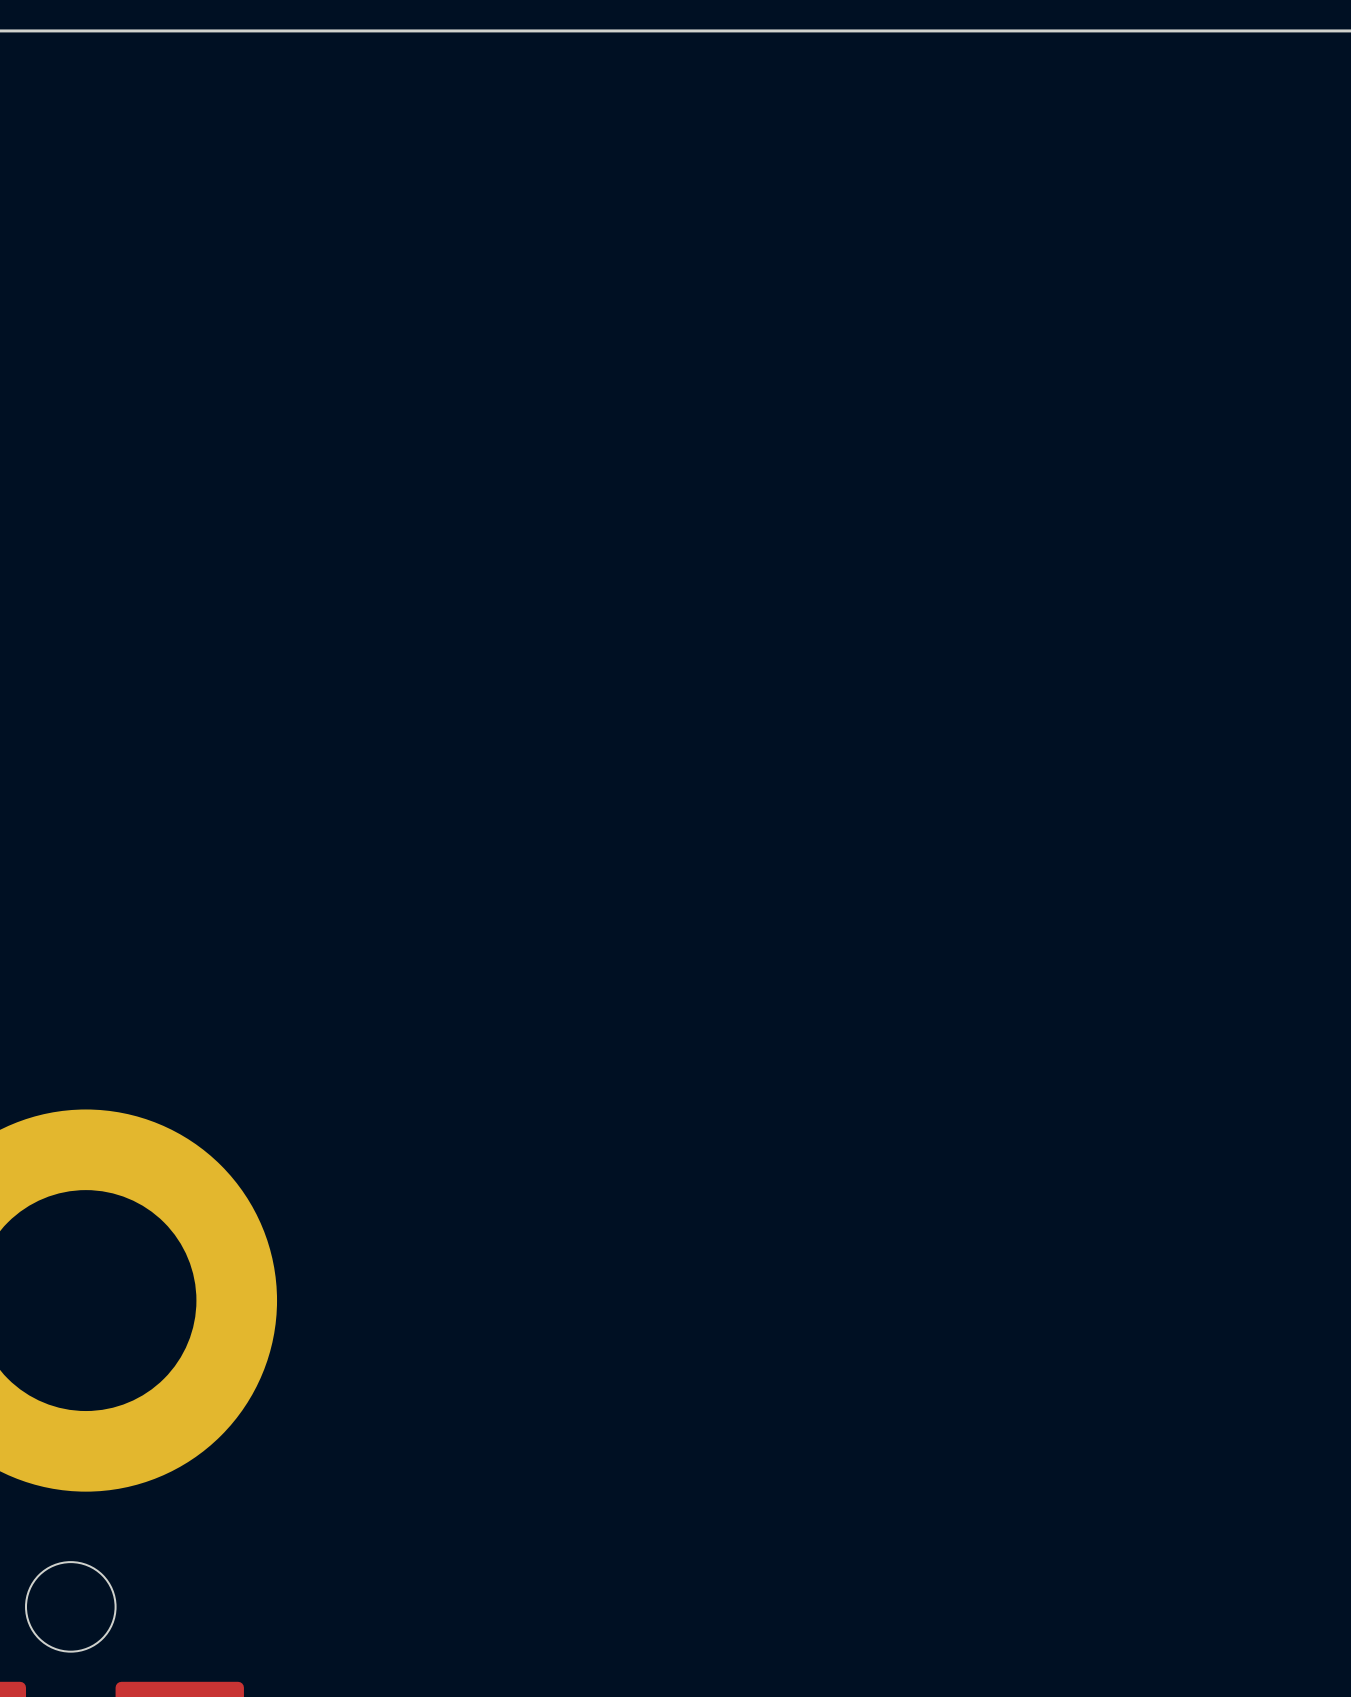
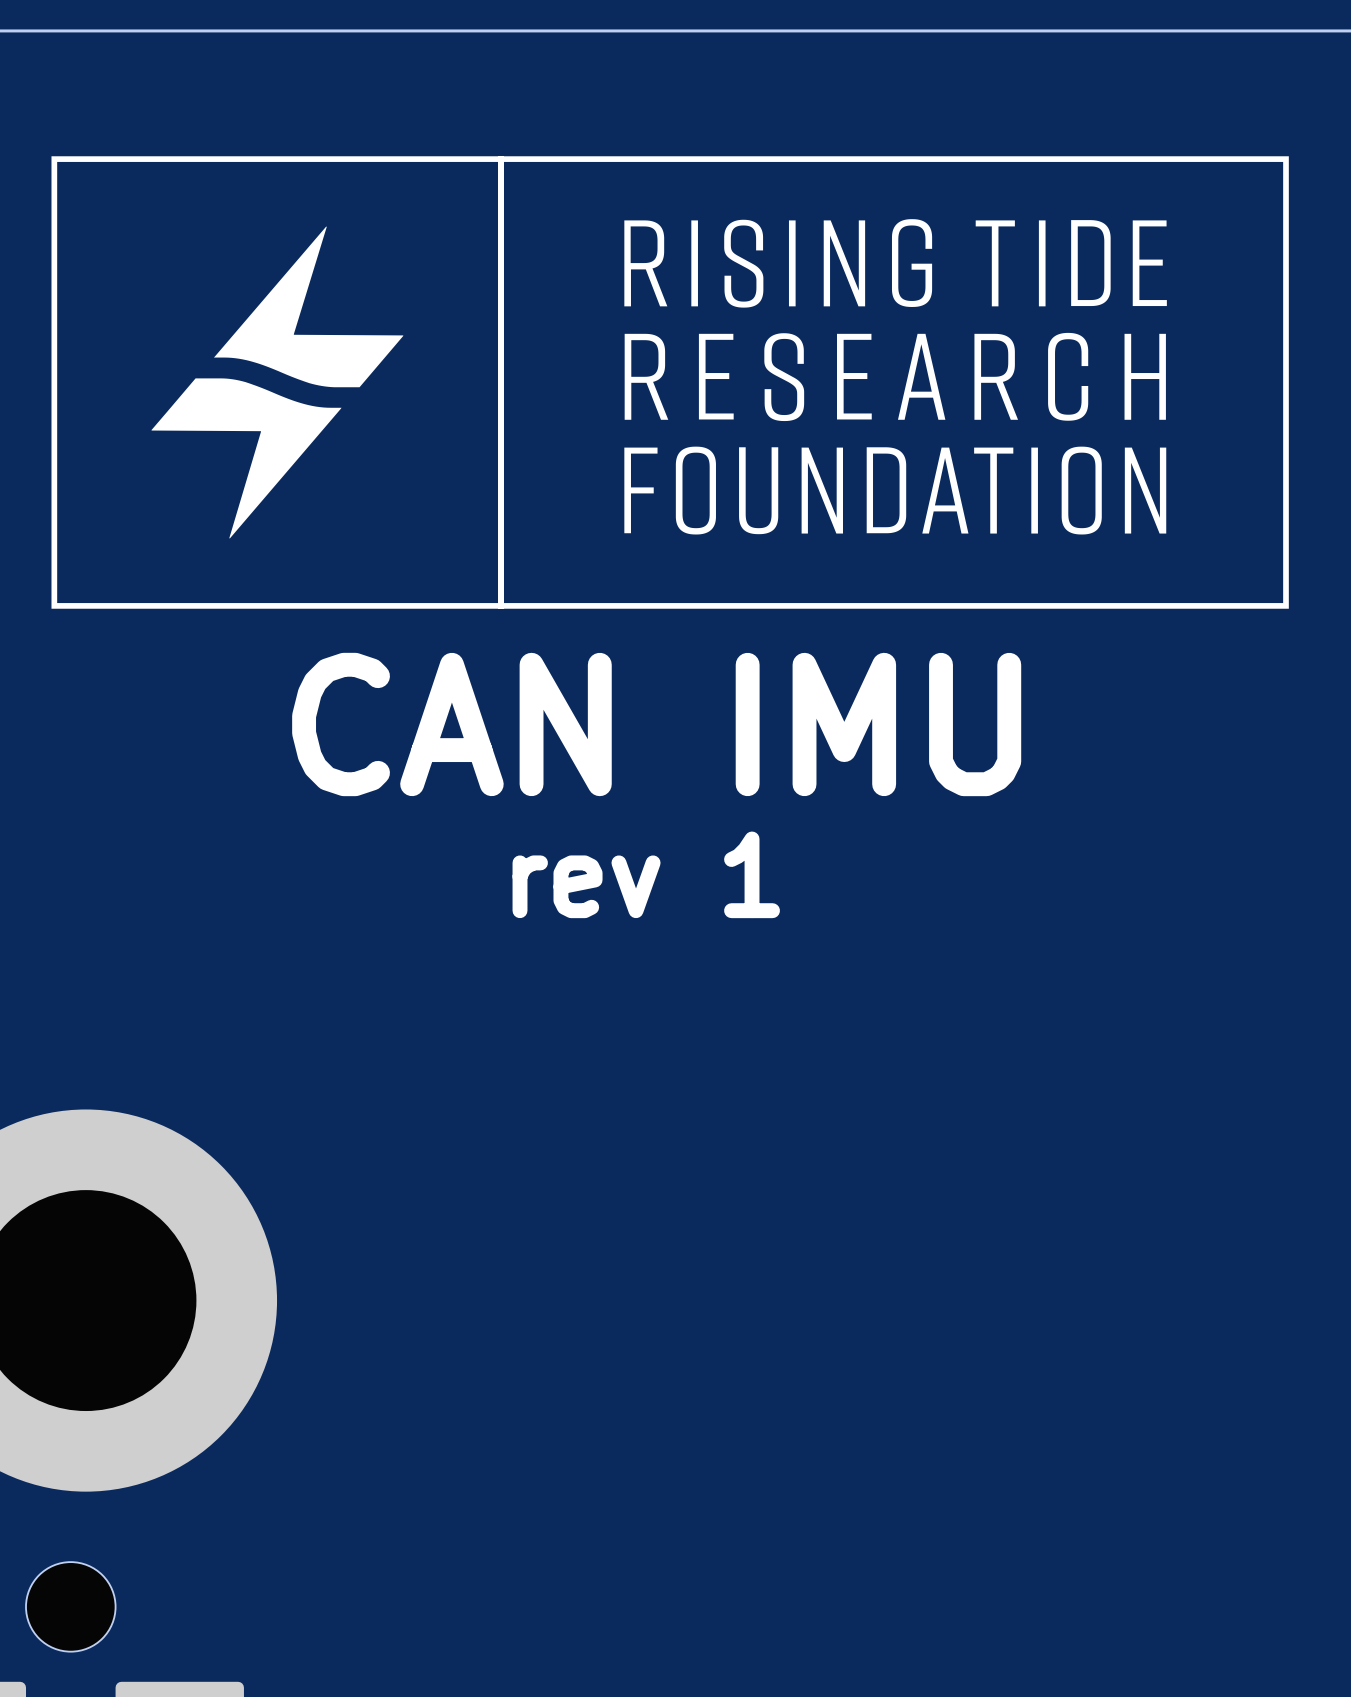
drawing: none -> [51, 156, 1289, 609]
text: none -> CAN IMU (656, 724)
text: none -> rev 1 (646, 874)

